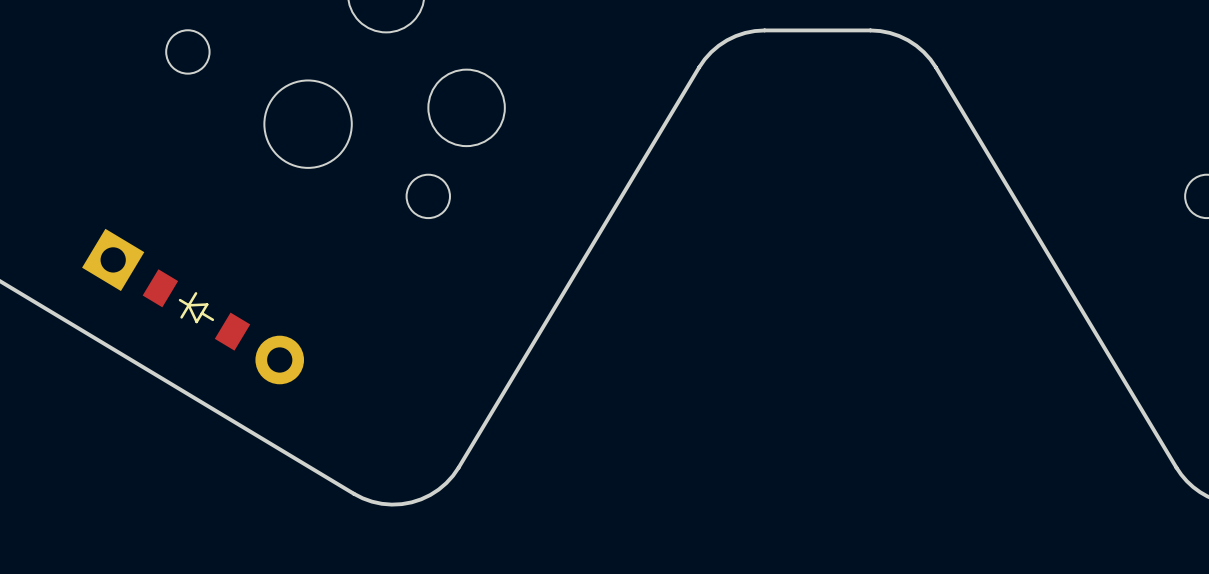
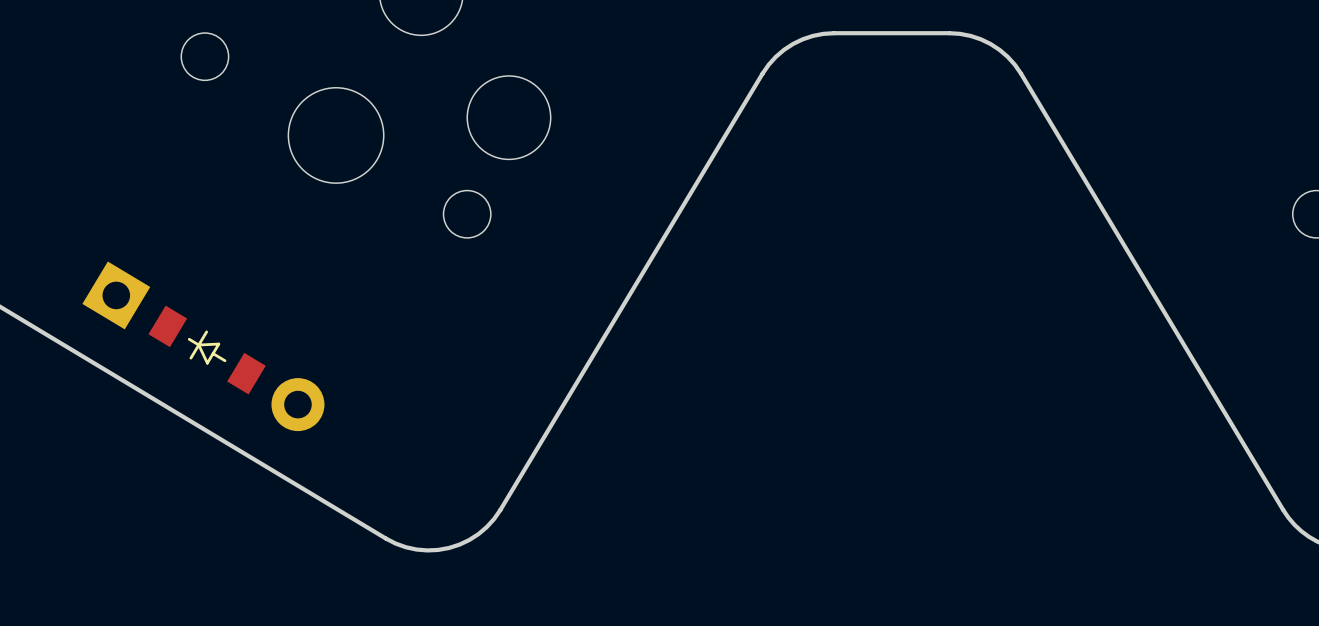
part footprint: [82, 228, 305, 385] -> [82, 261, 325, 432]

